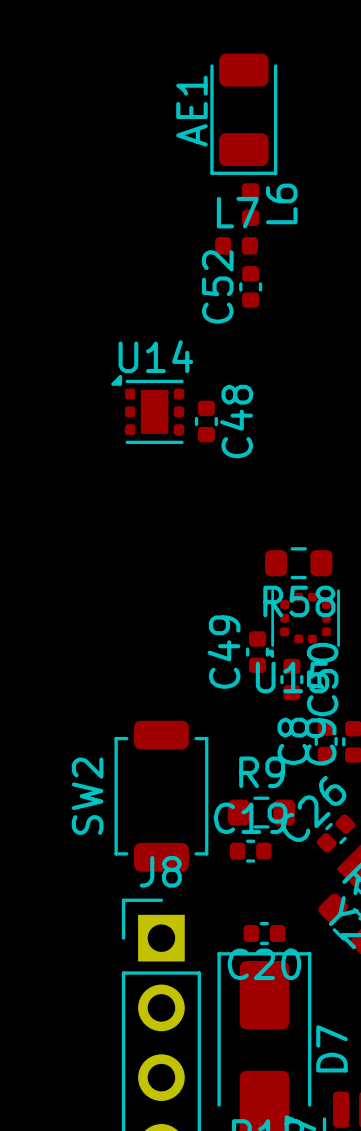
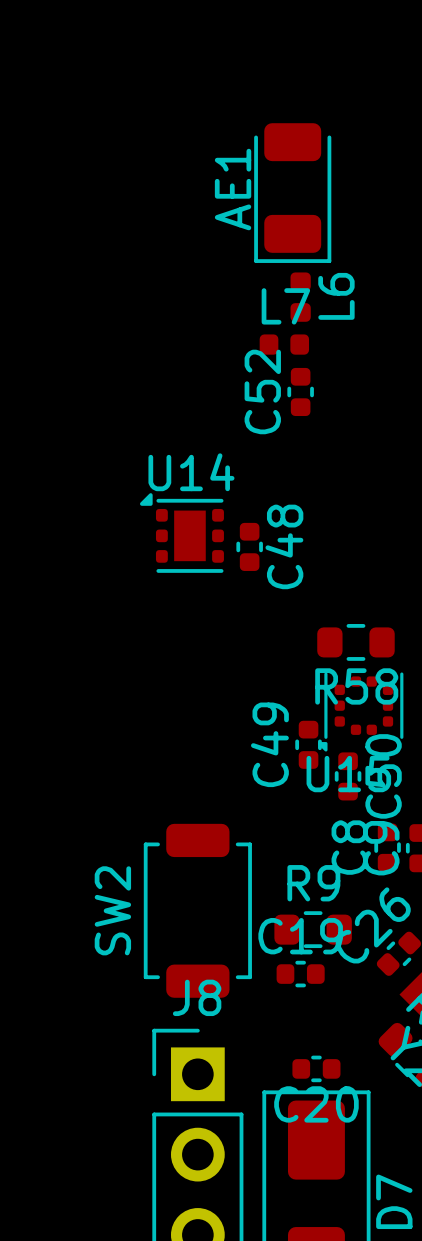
AE1 position: (243, 114) -> (292, 193)
L6 position: (250, 204) -> (300, 297)
L7 position: (236, 245) -> (284, 344)
C52 position: (250, 286) -> (300, 391)
U14 position: (147, 409) -> (181, 533)
C48 position: (206, 421) -> (249, 546)

